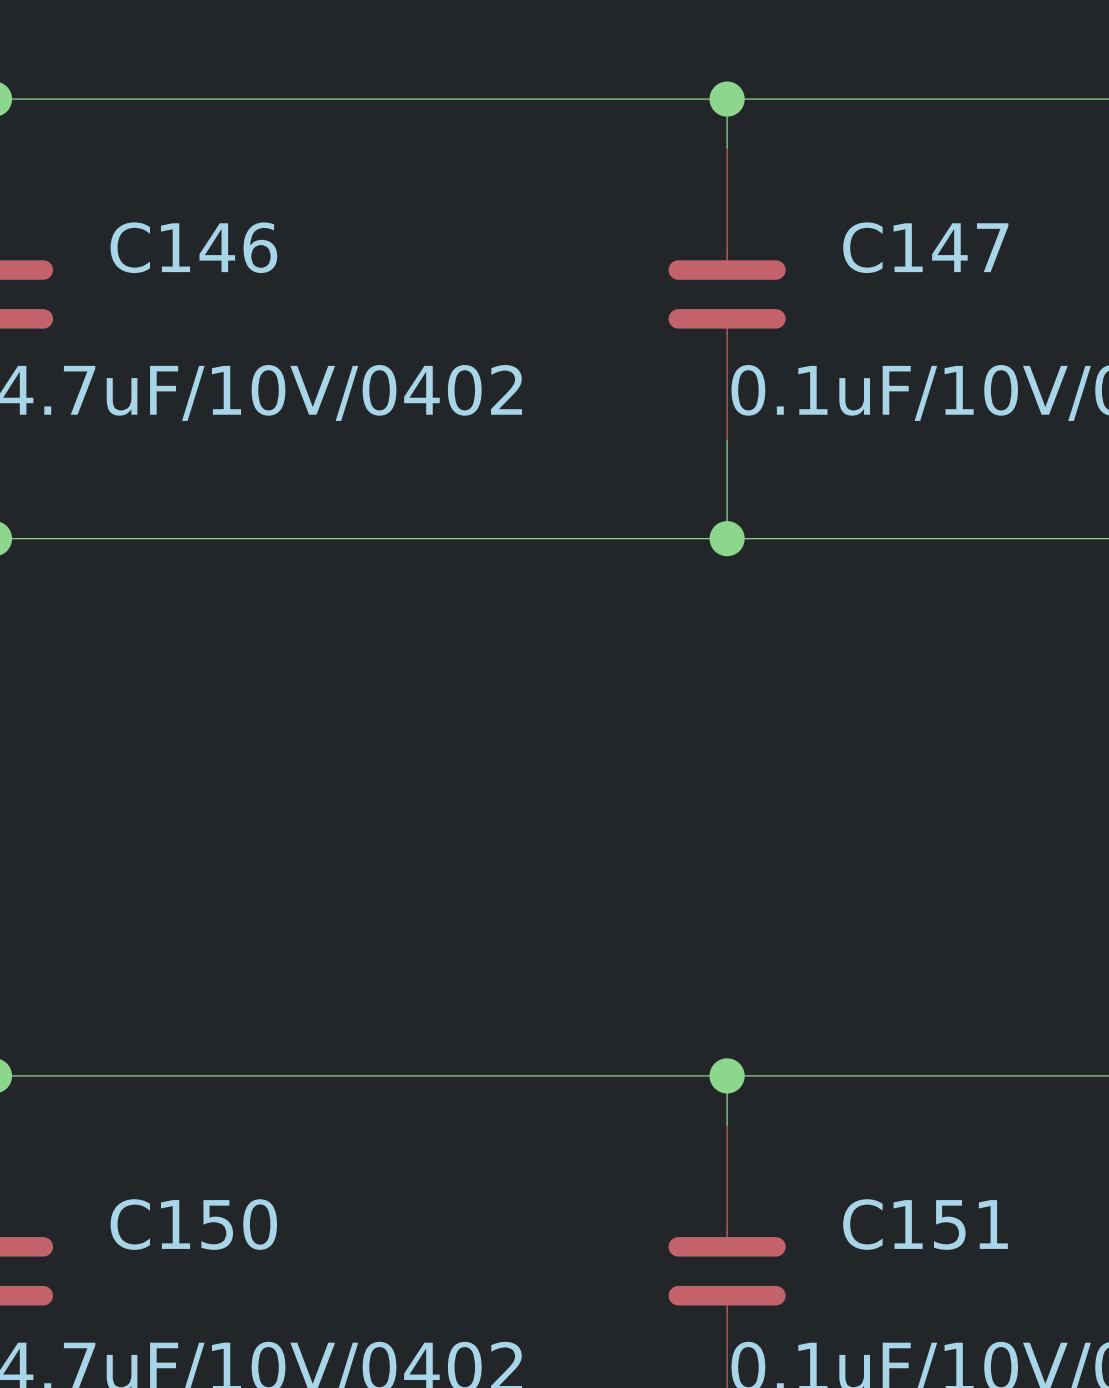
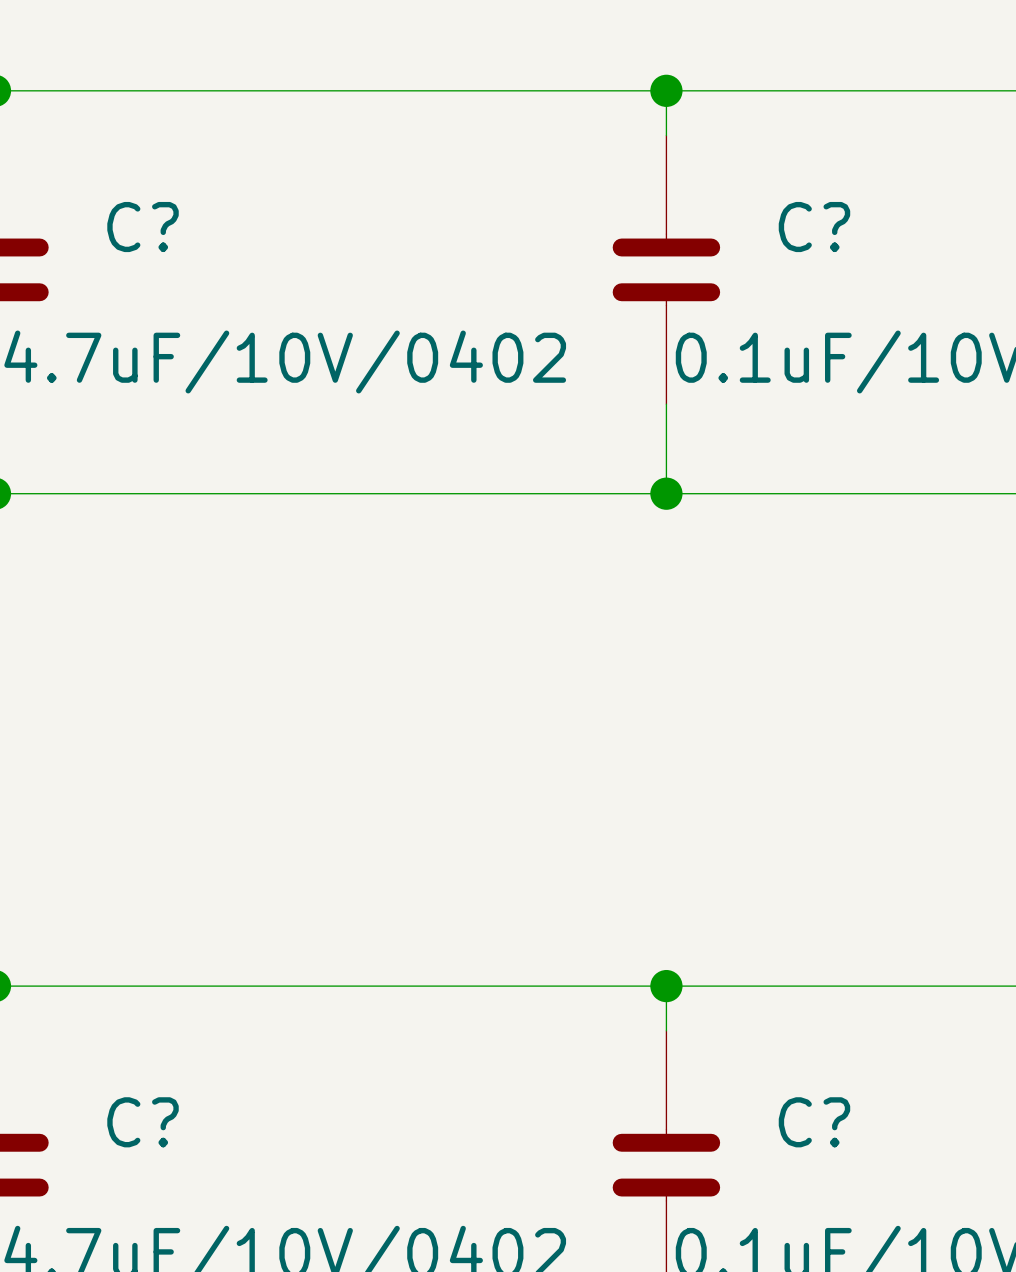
C146 name: C146 (193, 247) -> C? (143, 227)
C147 name: C147 (925, 247) -> C? (814, 227)
C150 name: C150 (193, 1224) -> C? (143, 1122)
C151 name: C151 (925, 1224) -> C? (814, 1122)

